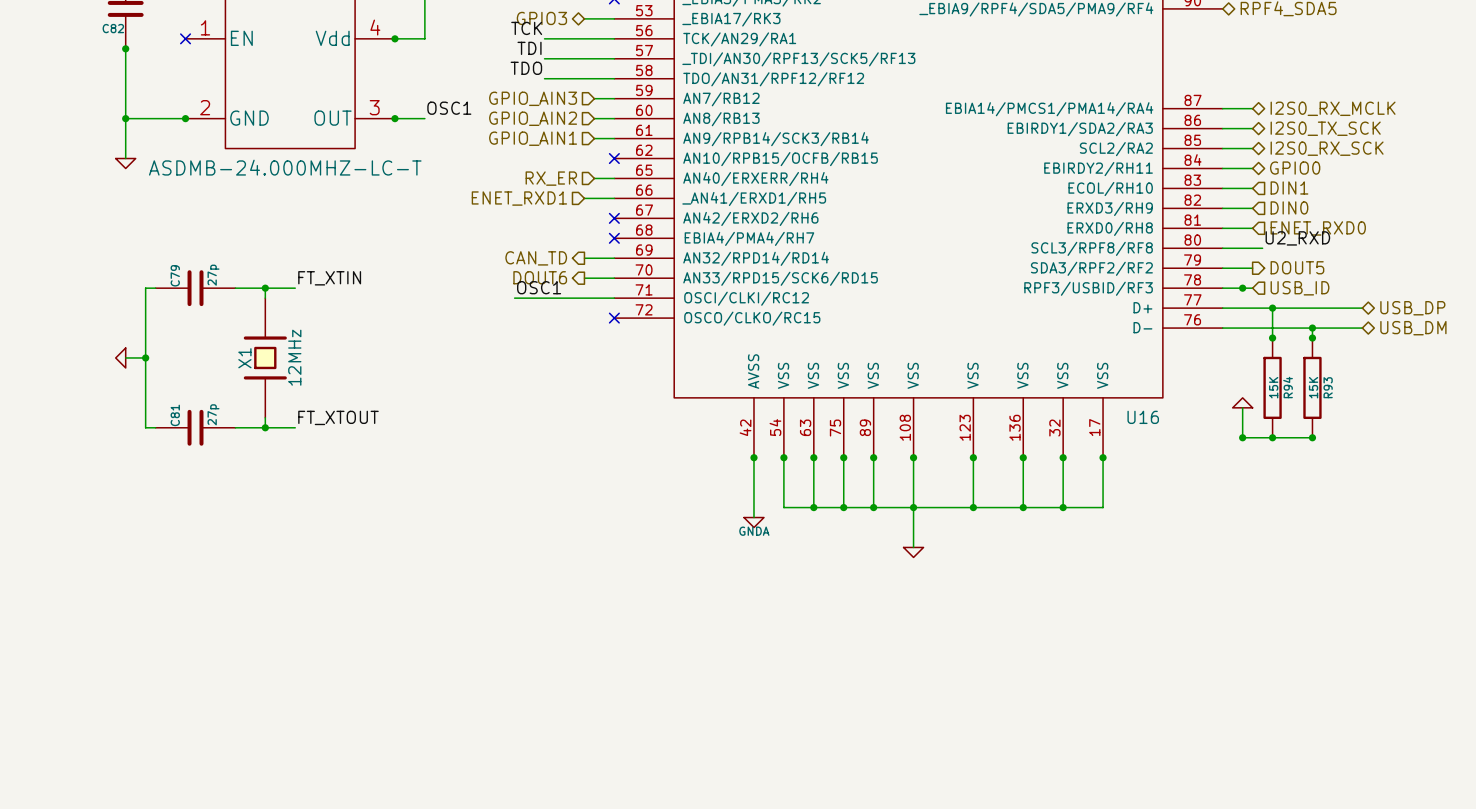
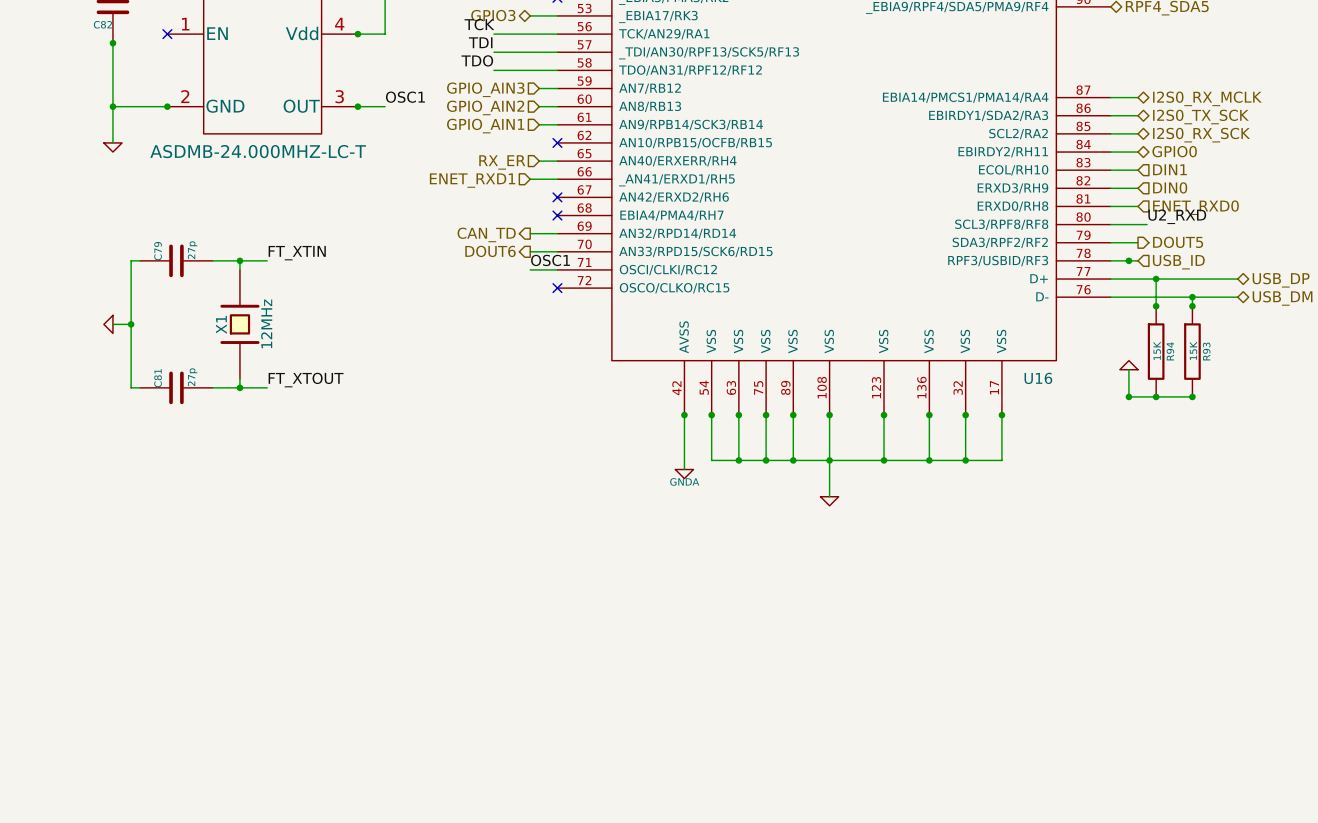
label position: OSC1 (539, 287) -> OSC1 (550, 260)
wire: (514, 298) (584, 298) -> none

